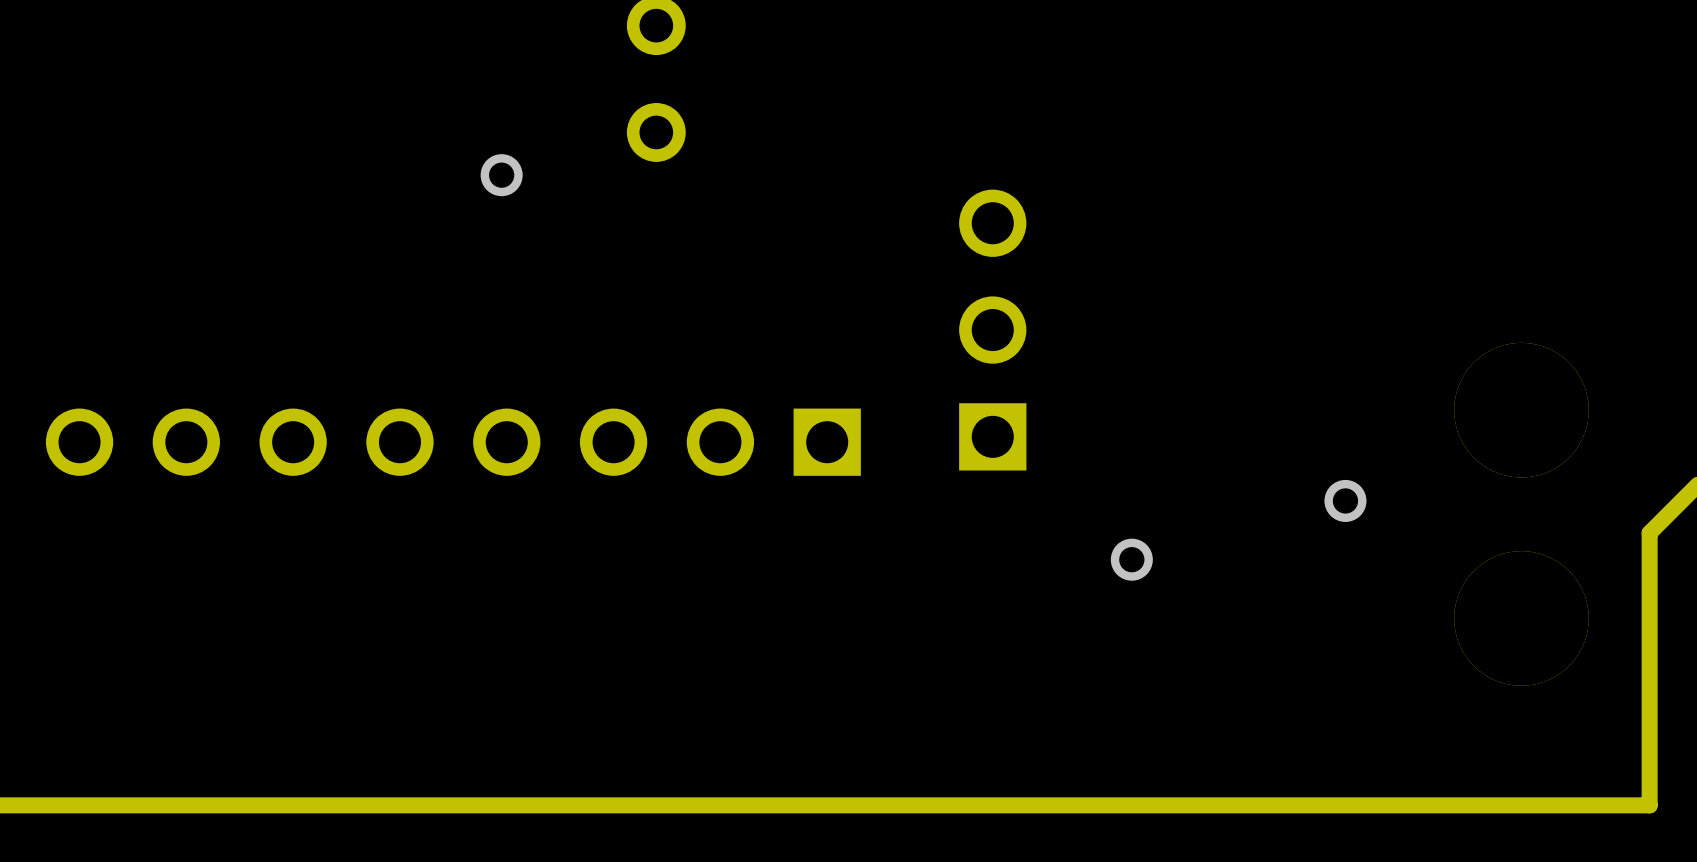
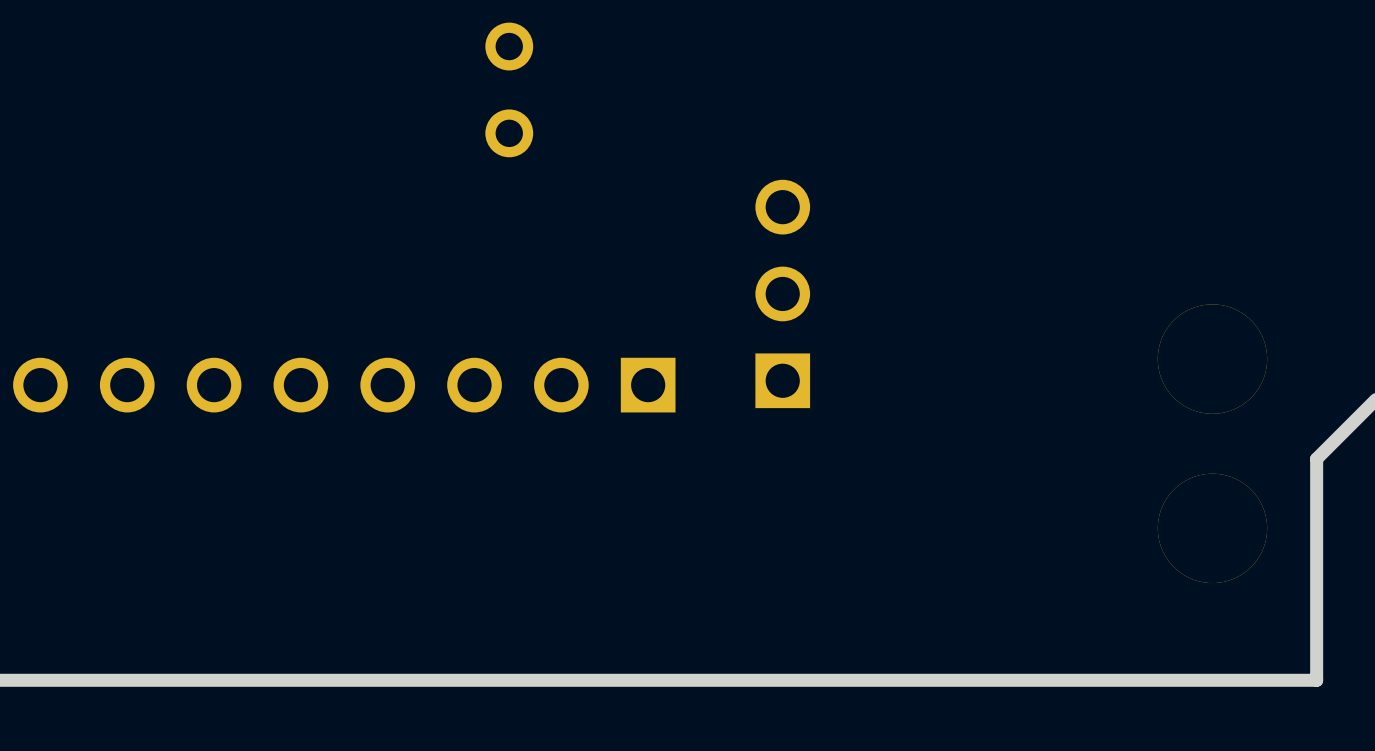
via: (501, 175) -> none
via: (1345, 500) -> none
via: (1131, 559) -> none

